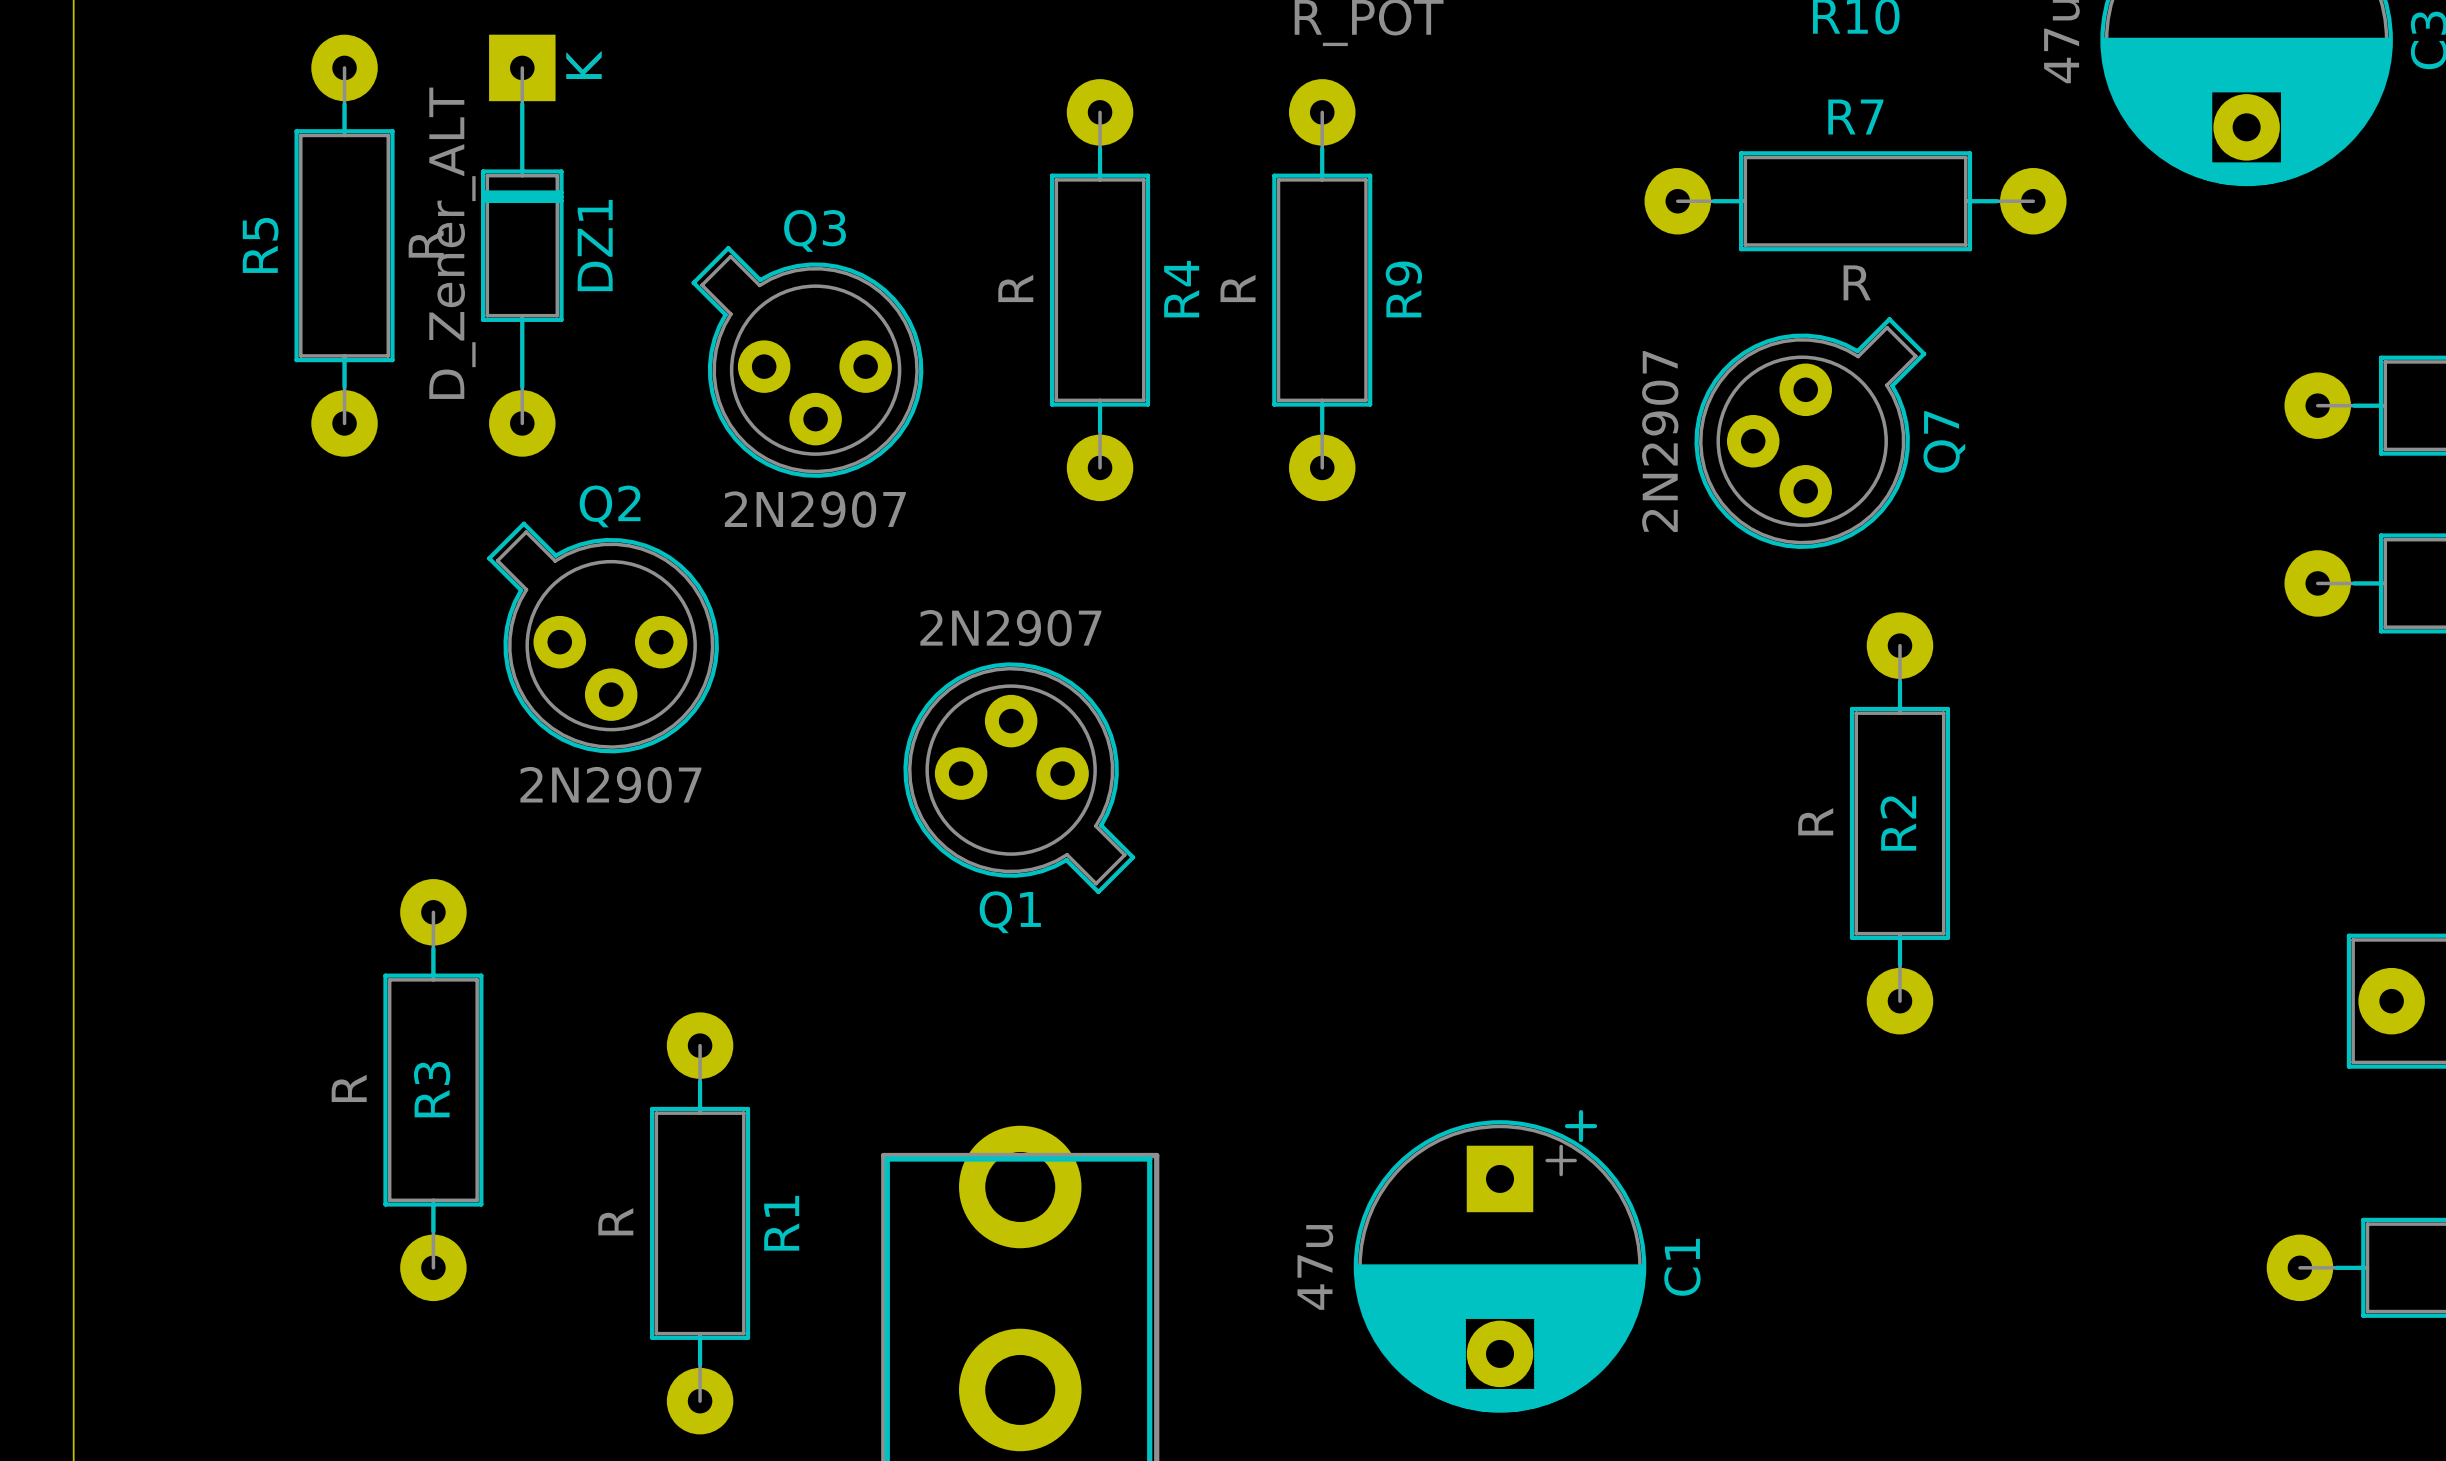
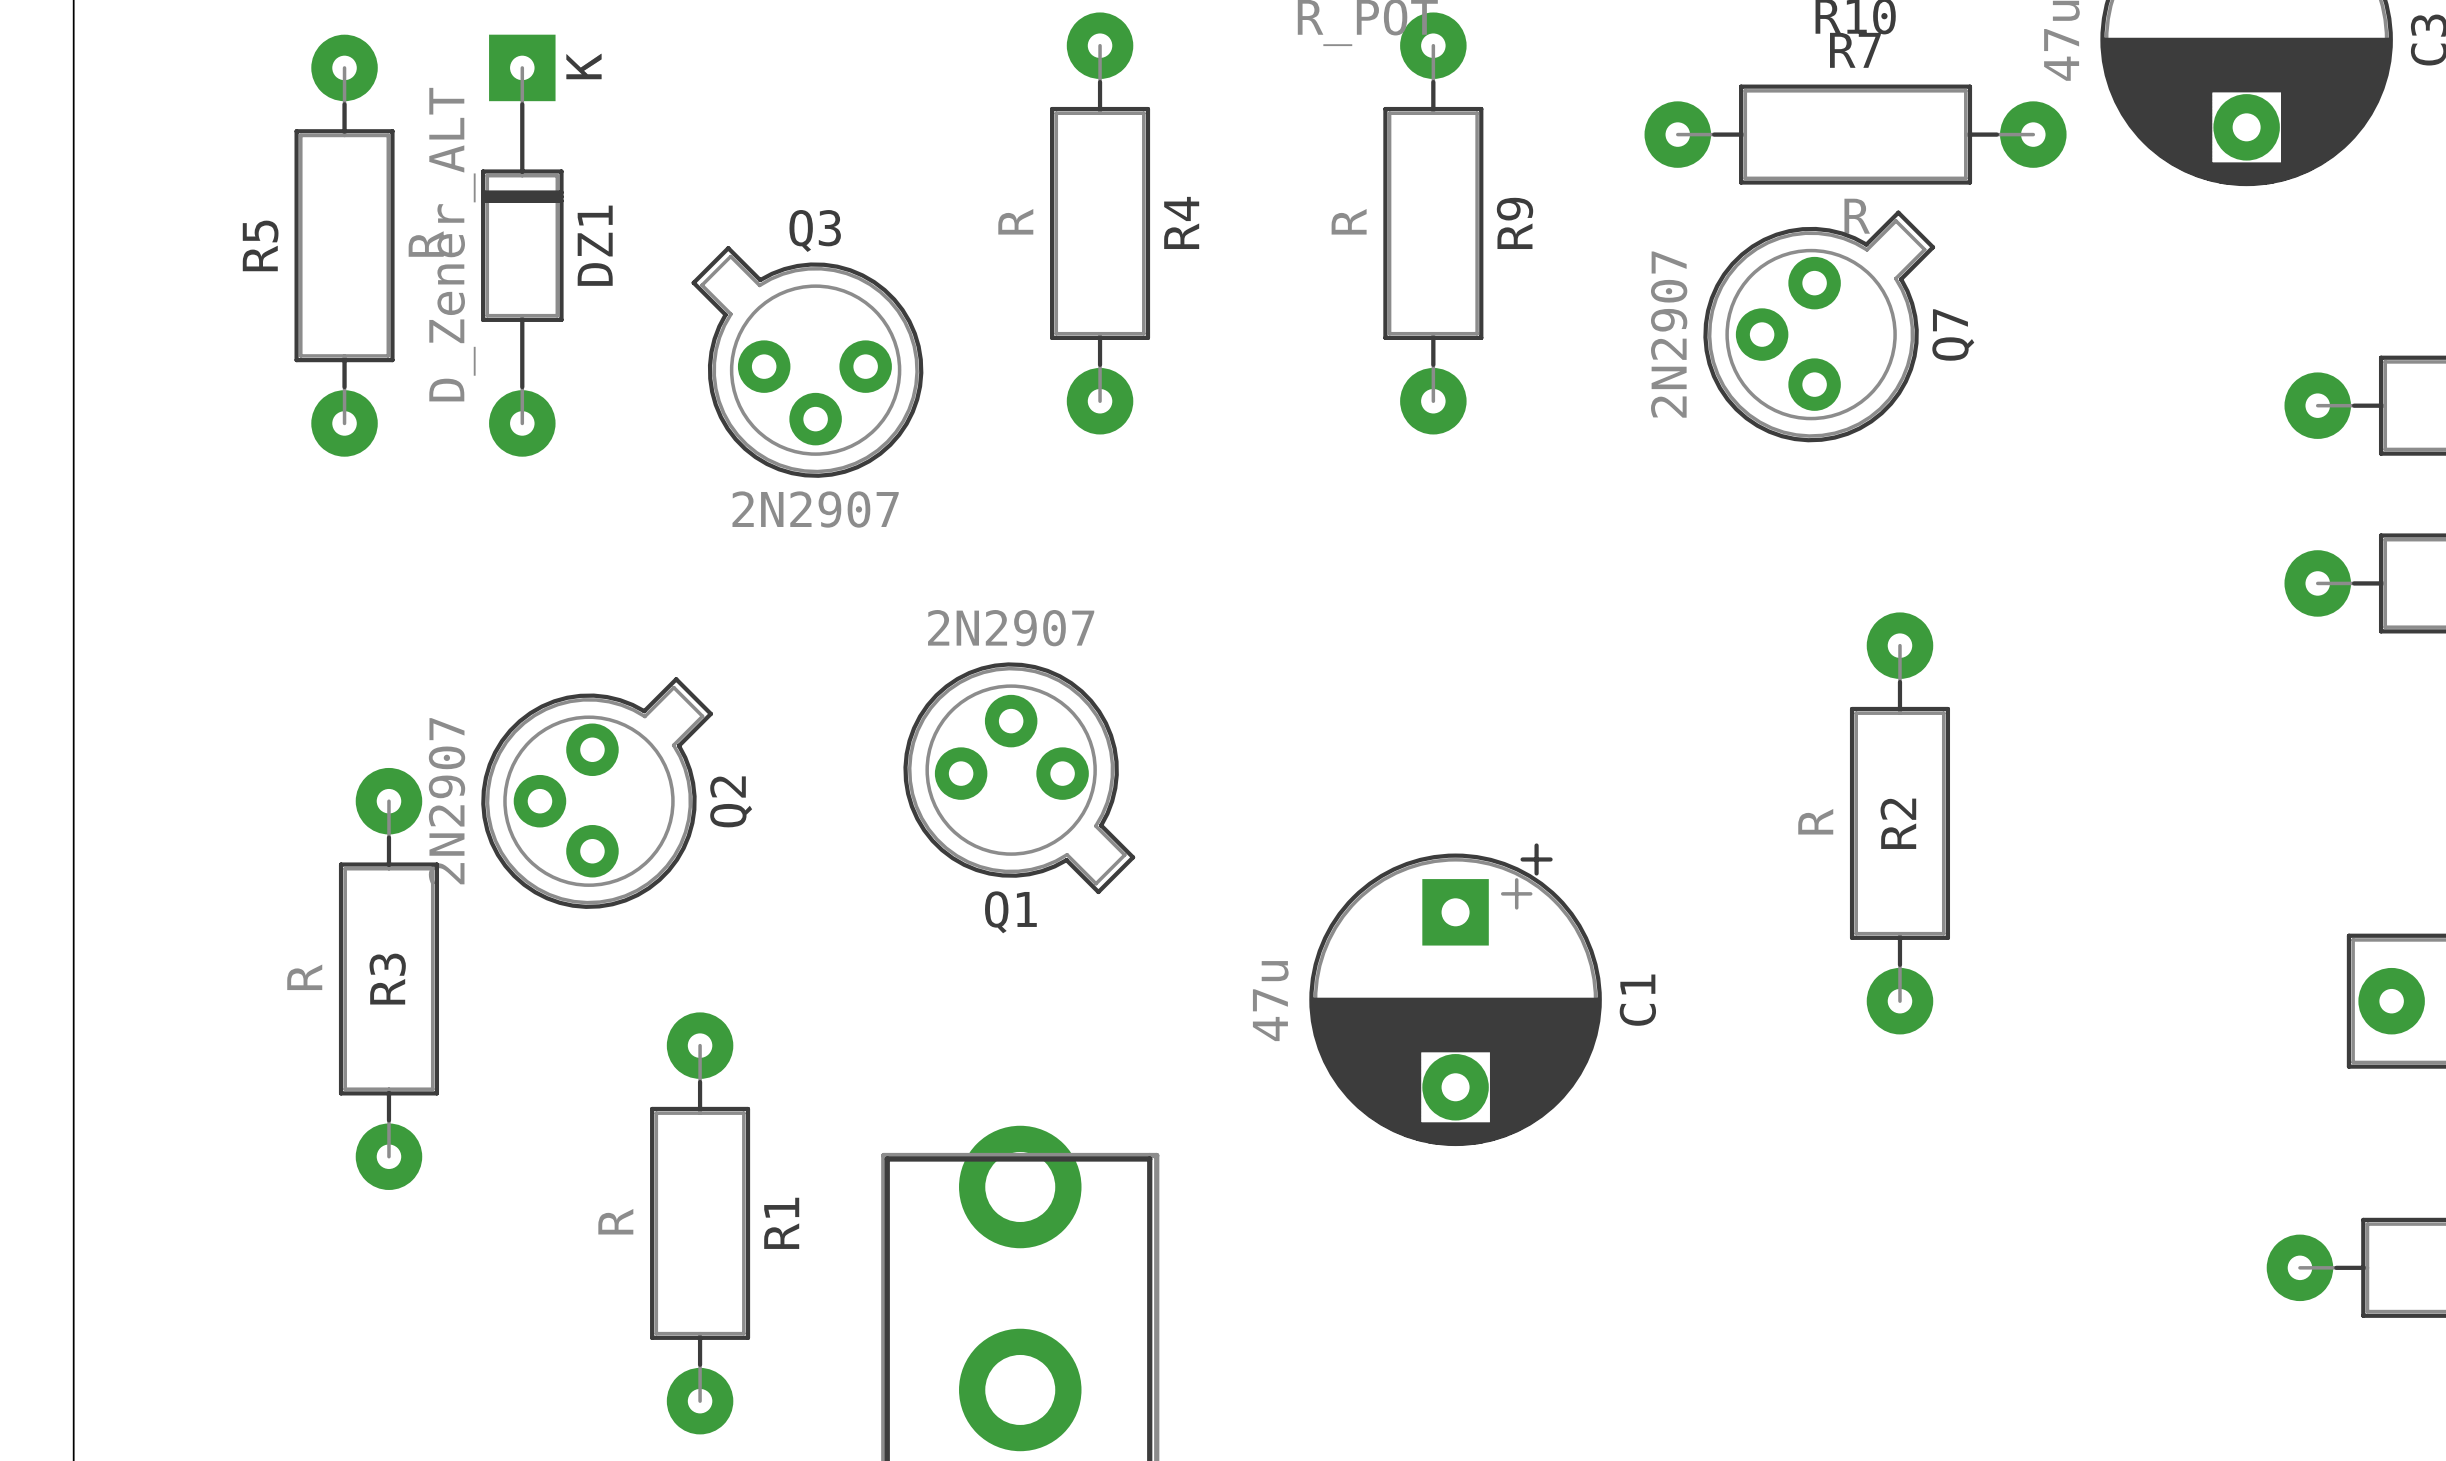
R7 position: (1855, 201) -> (1855, 134)
R4 position: (1100, 290) -> (1100, 223)
R9 position: (1322, 290) -> (1433, 223)
Q7 position: (1810, 433) -> (1819, 326)
Q2 rotation: 0° (603, 637) -> 90° clockwise (597, 793)
Q2 position: (603, 637) -> (597, 793)
R3 position: (433, 1090) -> (388, 978)
C1 position: (1500, 1261) -> (1455, 994)

